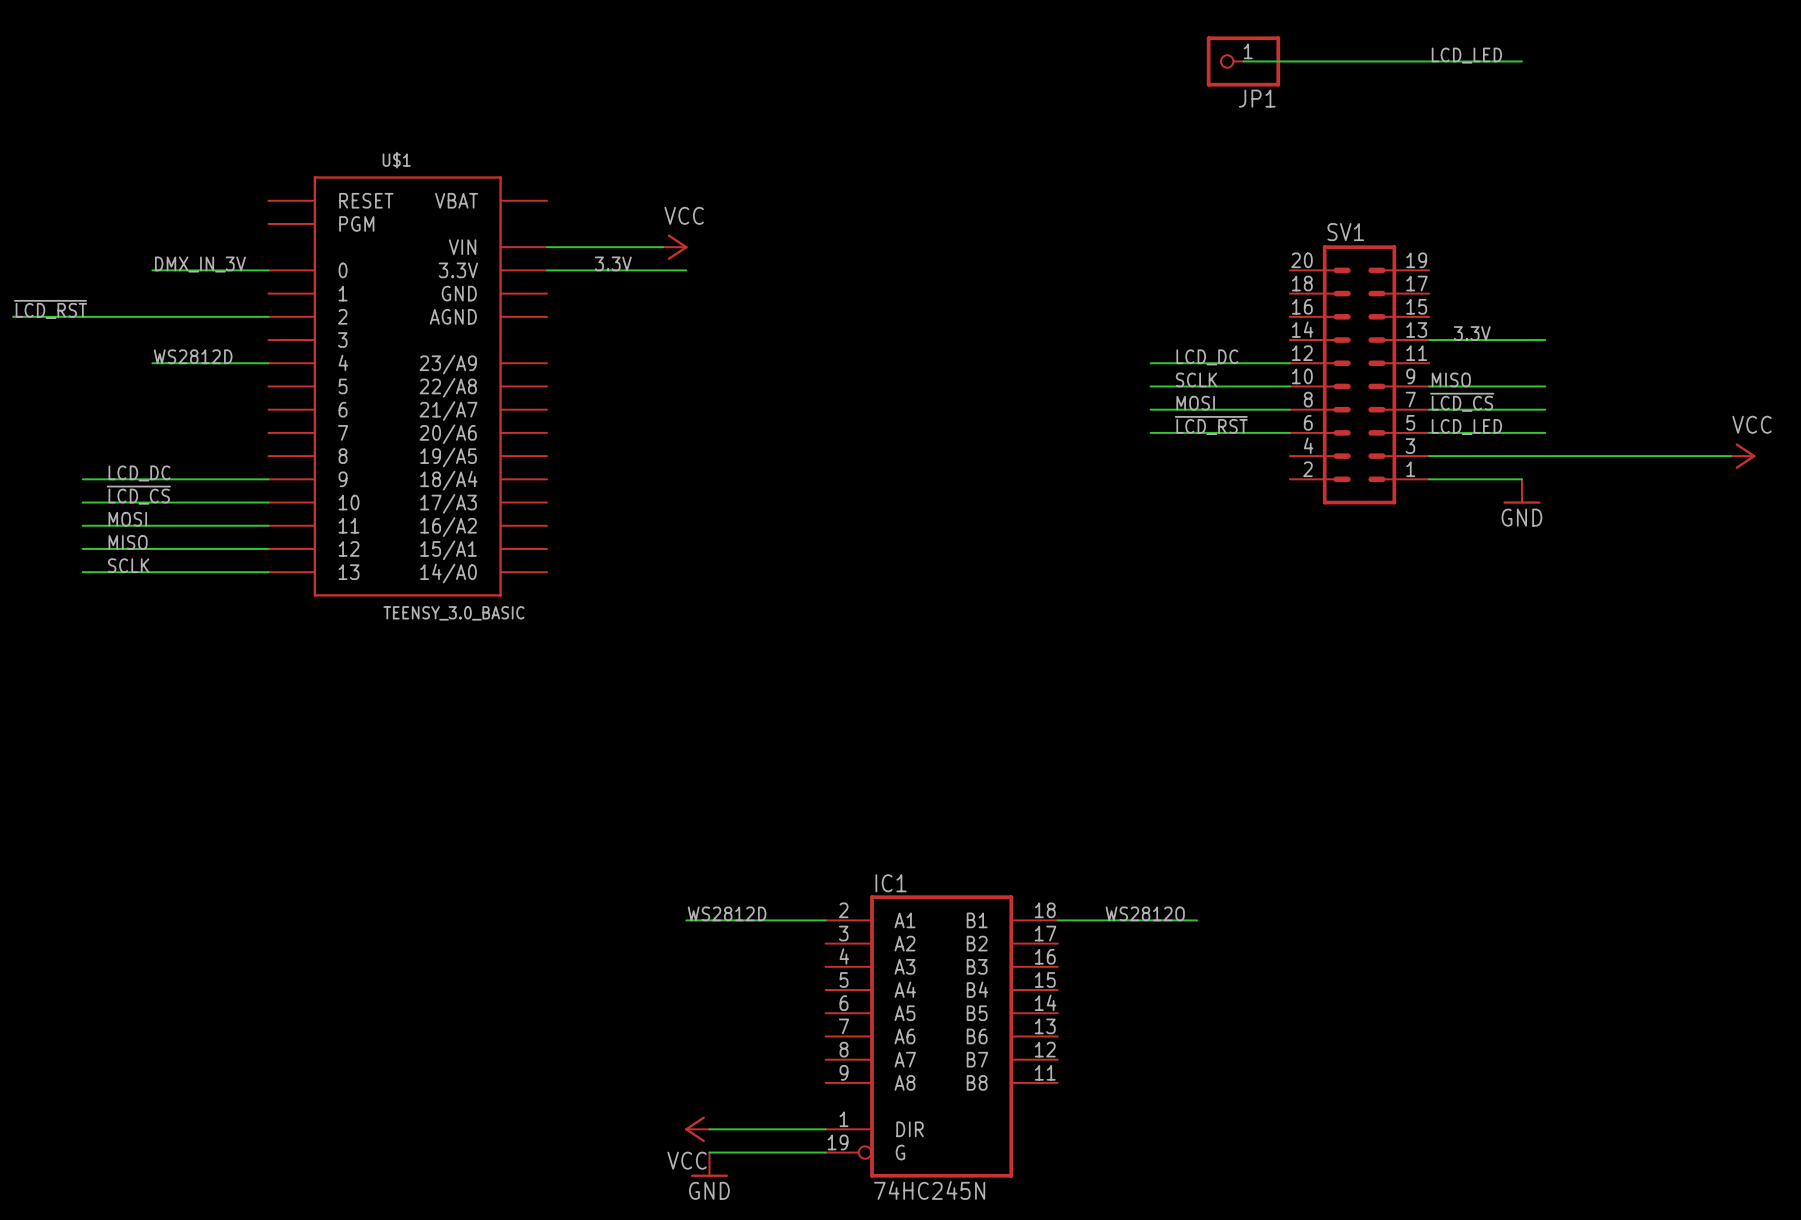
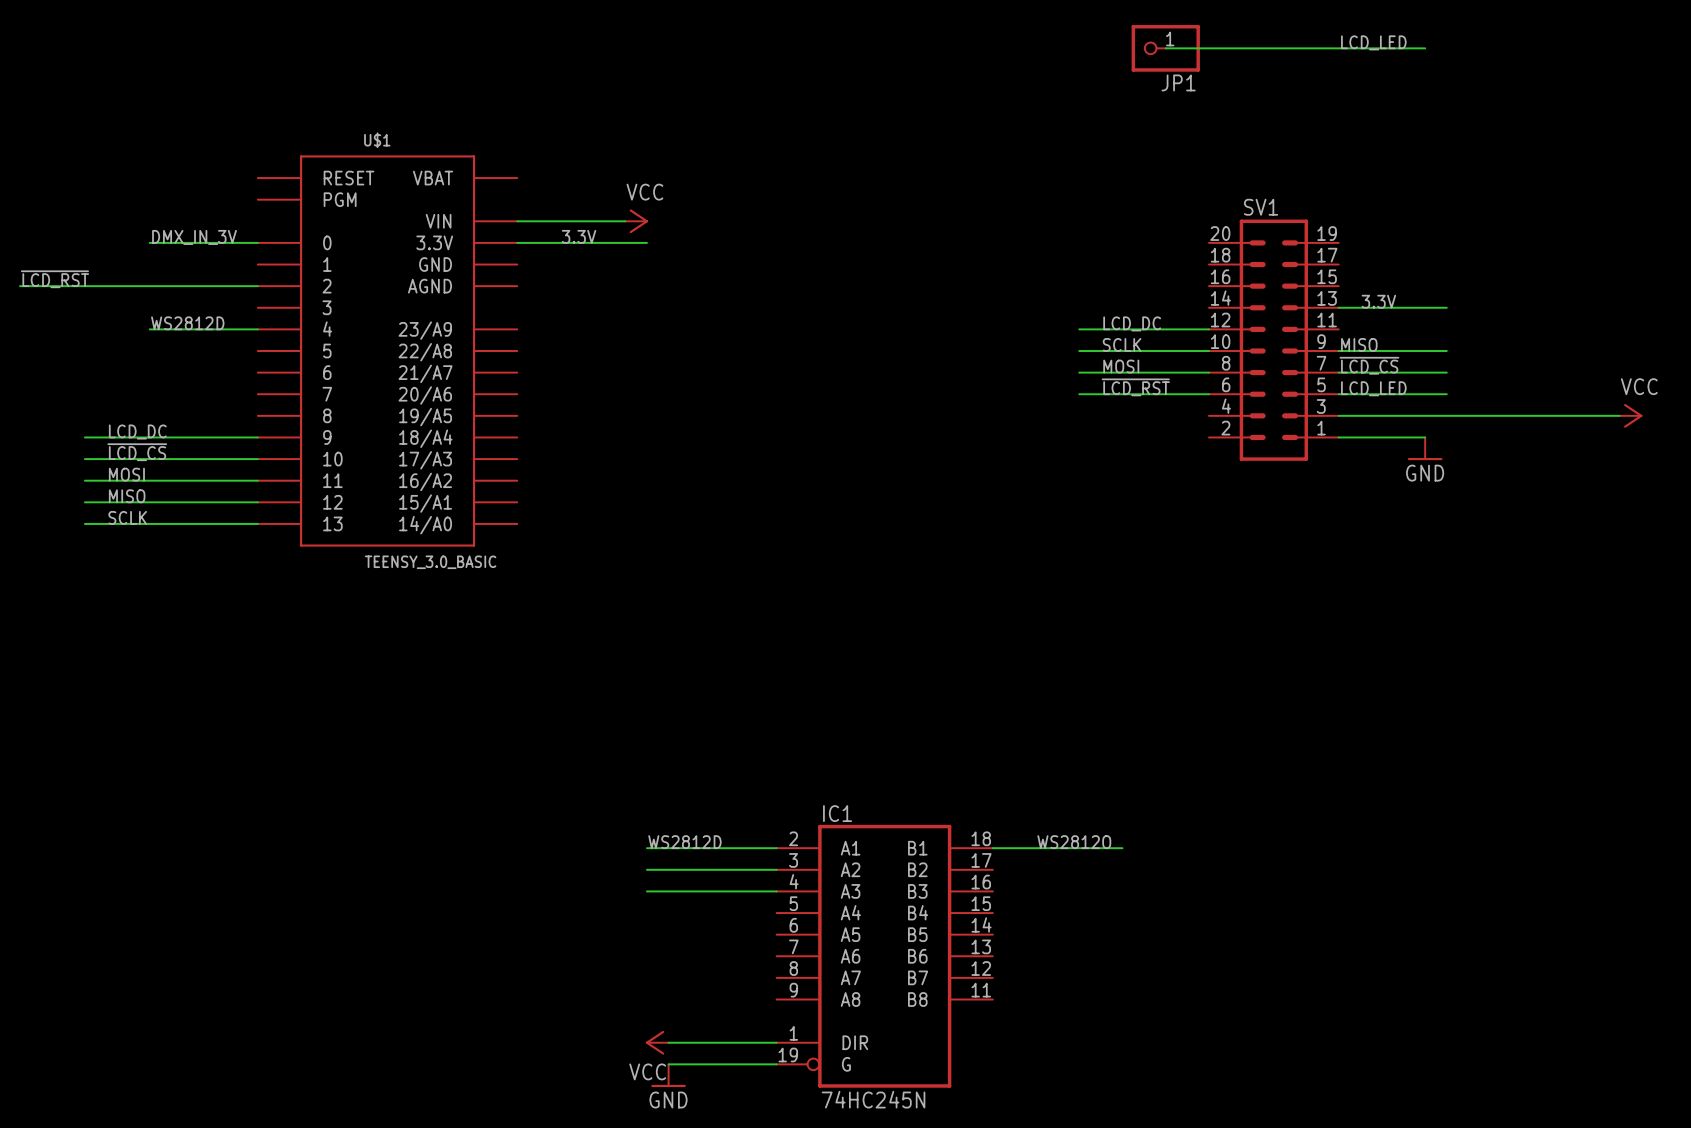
wire: none -> (646, 869) (776, 869)
wire: none -> (646, 891) (776, 891)

